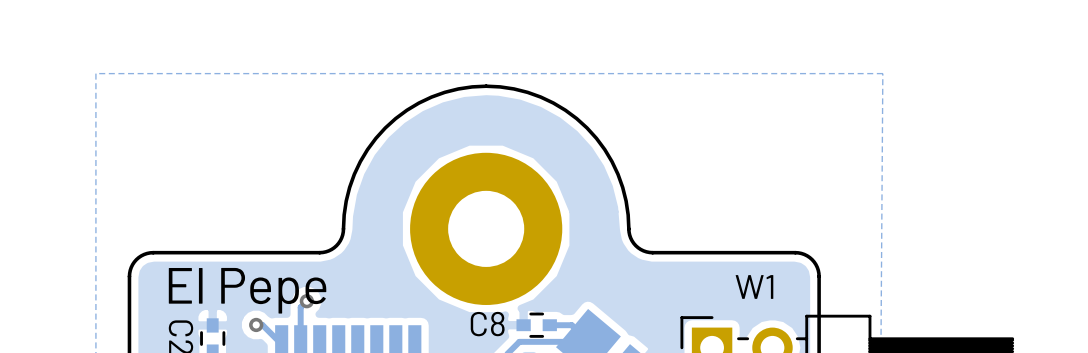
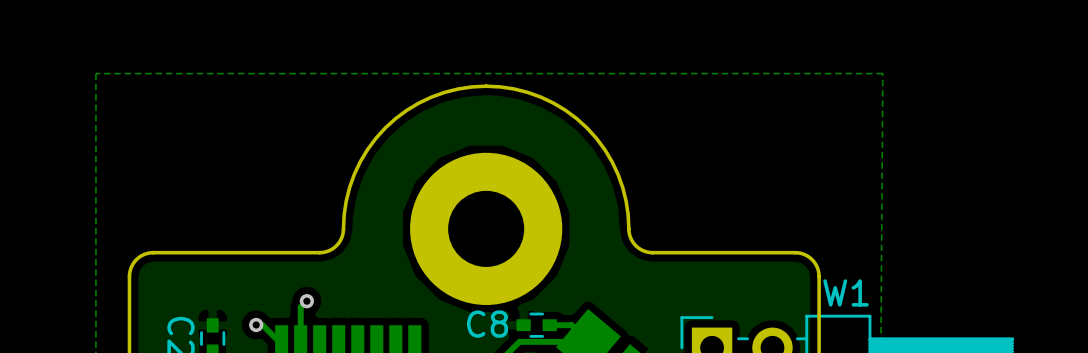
W1 name position: W1 (754, 286) -> W1 (845, 292)
text: El Pepe (247, 290) -> none

